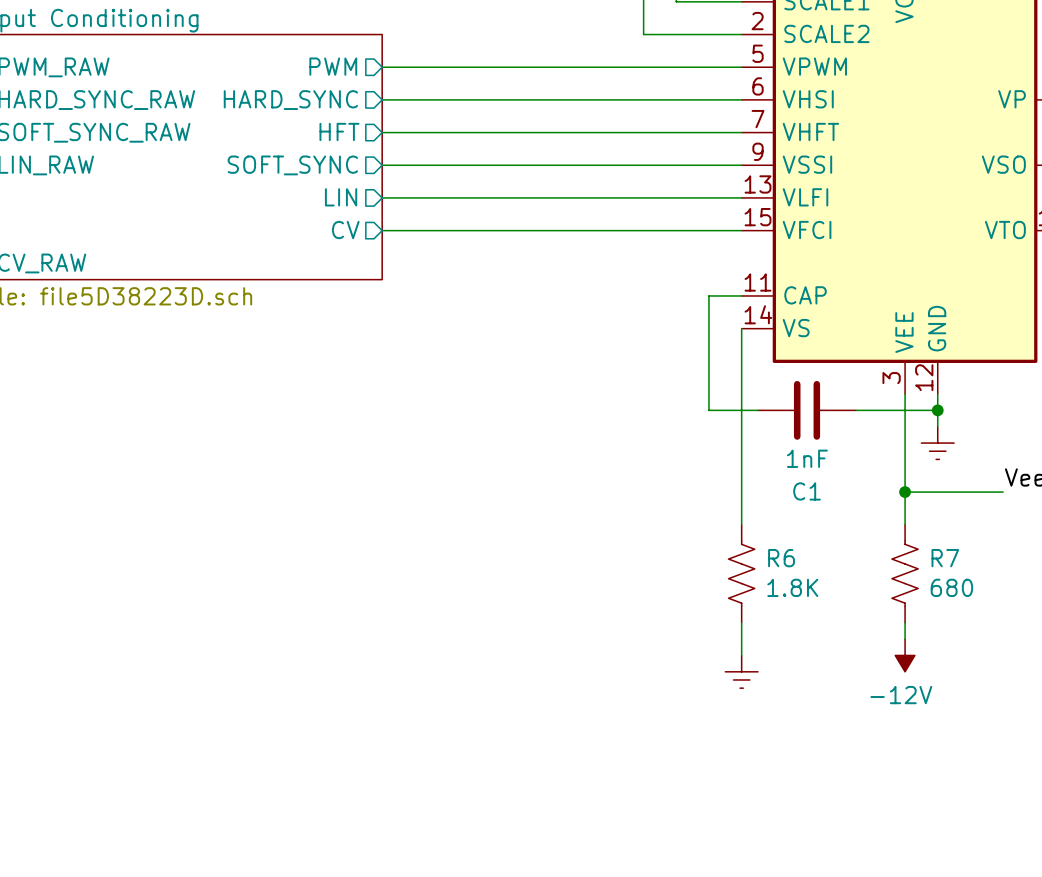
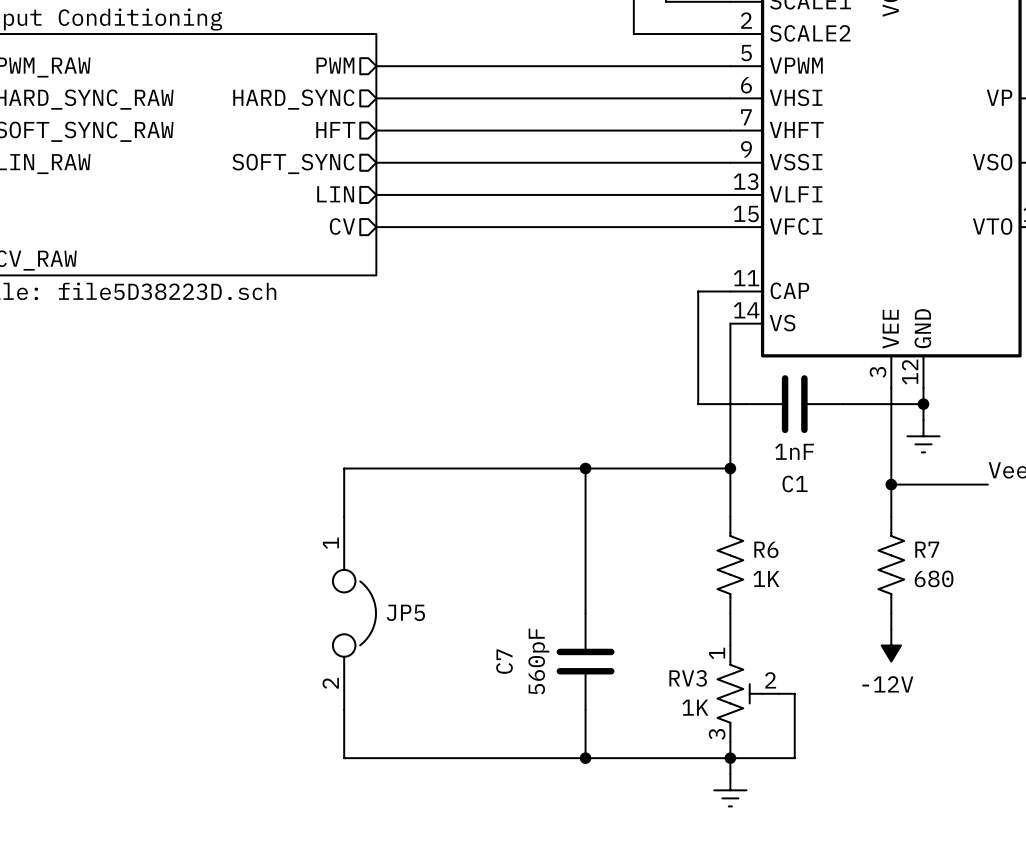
wire: none -> (585, 468) (585, 613)
junction: none -> (585, 468)
wire: none -> (730, 468) (344, 468) (344, 516)
junction: none -> (730, 468)
R6 value: 1.8K (792, 587) -> 1K (766, 578)
JP5: none -> (354, 613)
C7: none -> 560pF (585, 661)
power symbol position: (741, 671) -> (730, 790)
RV3: none -> 1K (748, 693)
wire: none -> (778, 693) (794, 693) (794, 758) (344, 758) (344, 709)
wire: none -> (585, 709) (585, 758)
wire: none -> (730, 742) (730, 774)
junction: none -> (585, 758)
junction: none -> (730, 758)

